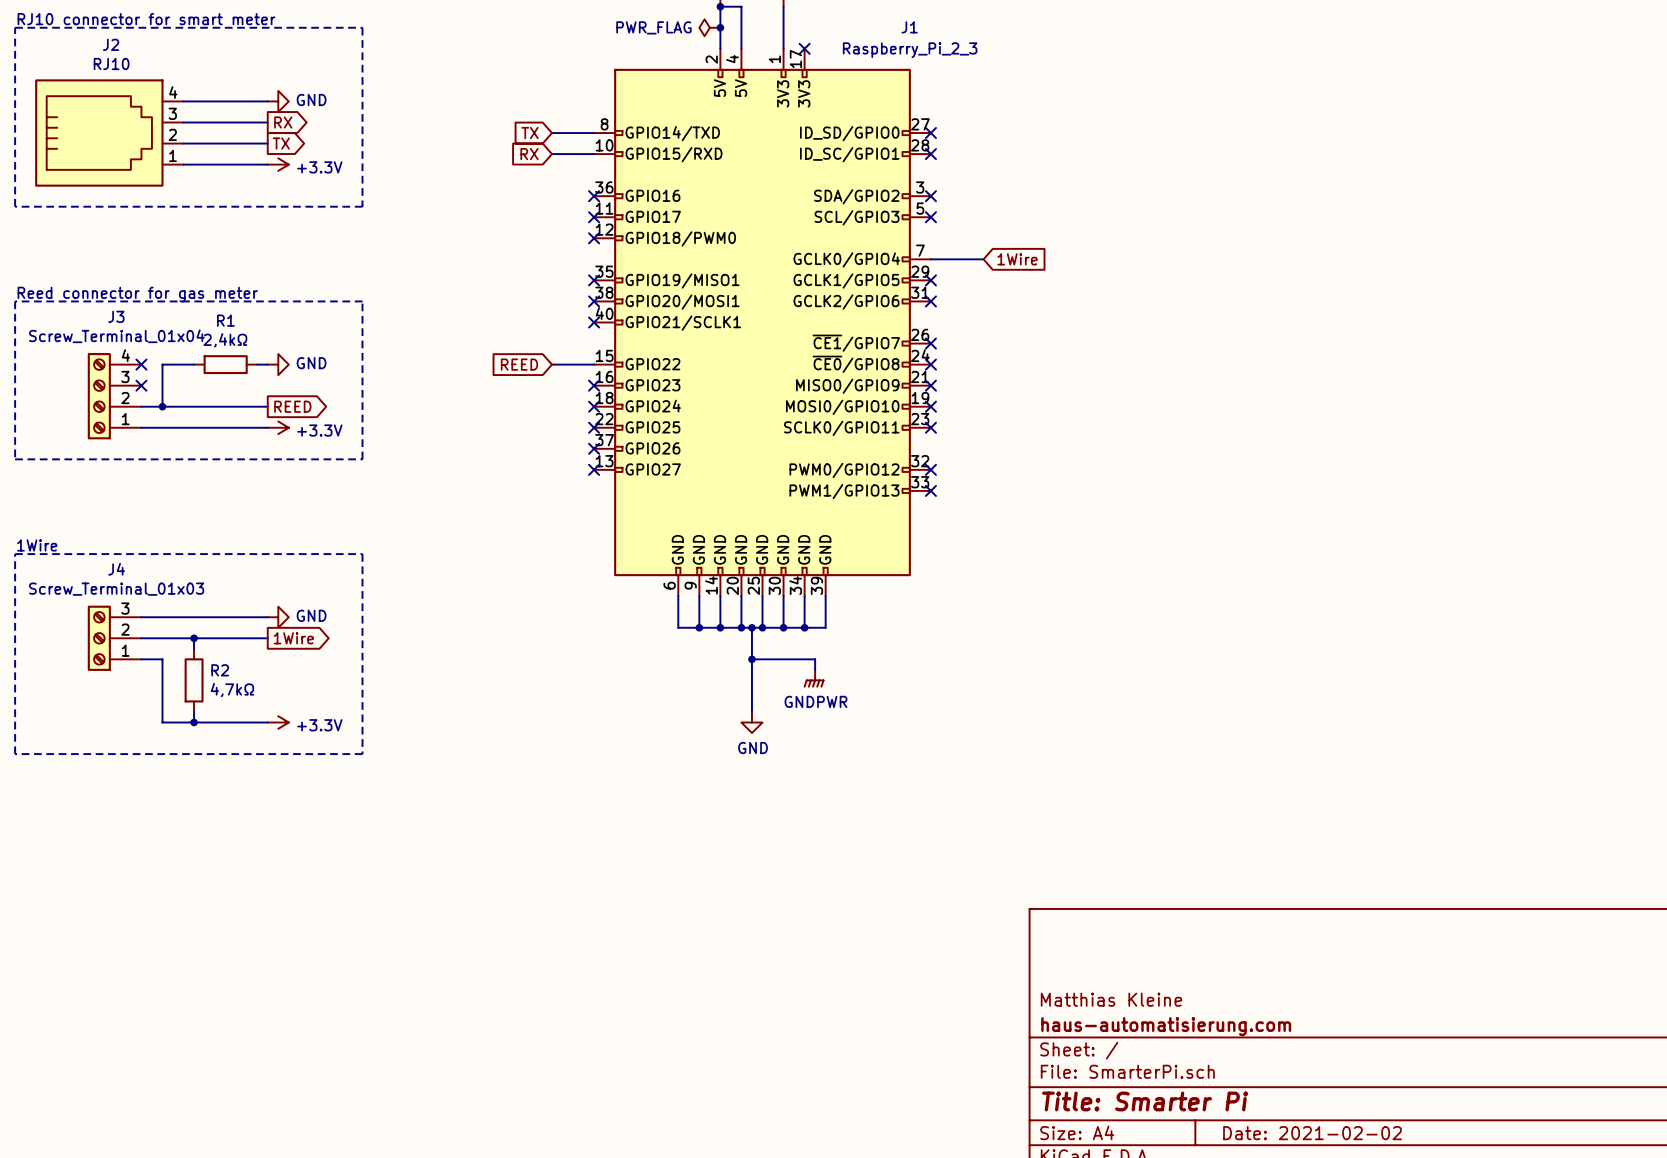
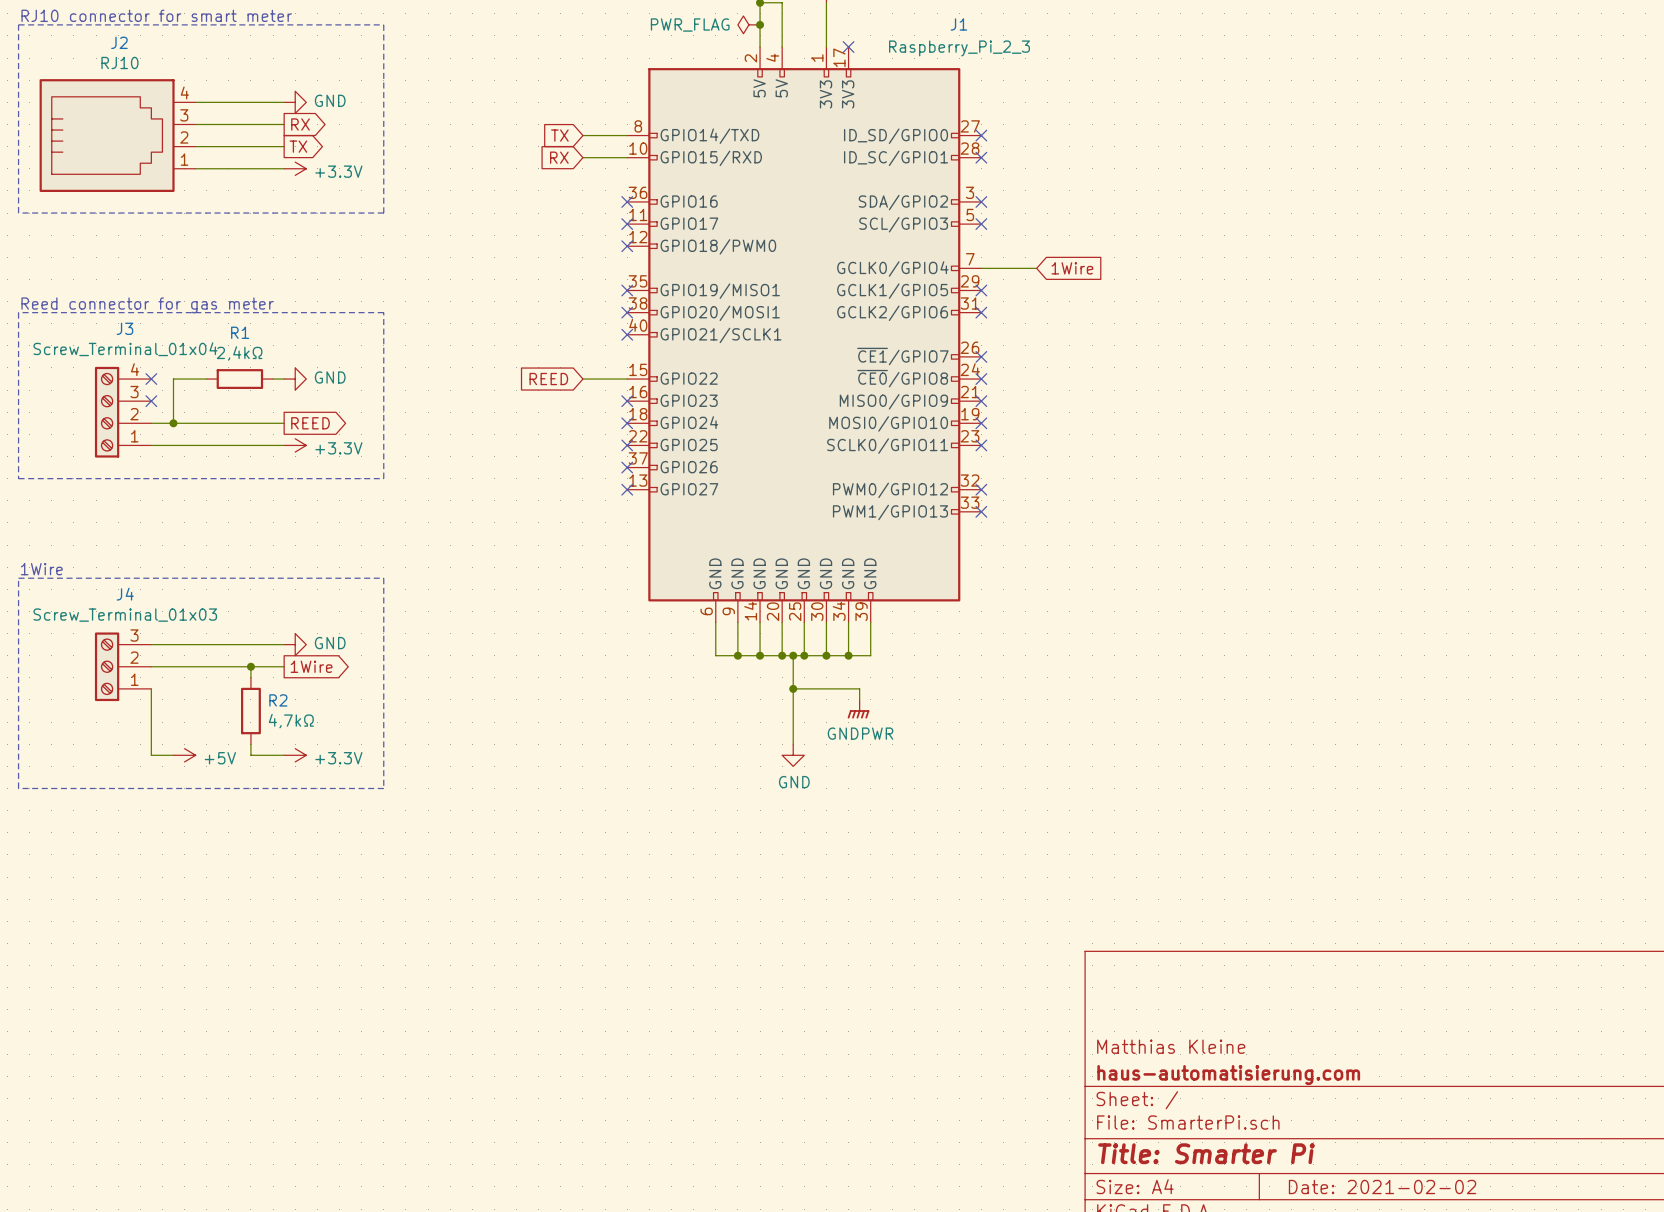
wire: (194, 638) (194, 648) -> (250, 666) (250, 677)
junction position: (194, 638) -> (250, 666)
wire: (141, 659) (162, 659) (162, 722) (236, 722) -> (151, 688) (151, 755) (173, 755)
R2 position: (194, 680) -> (250, 711)
wire: (194, 711) (194, 722) -> (250, 744) (250, 755)
power symbol: none -> +5V (184, 755)
junction: (194, 722) -> none

